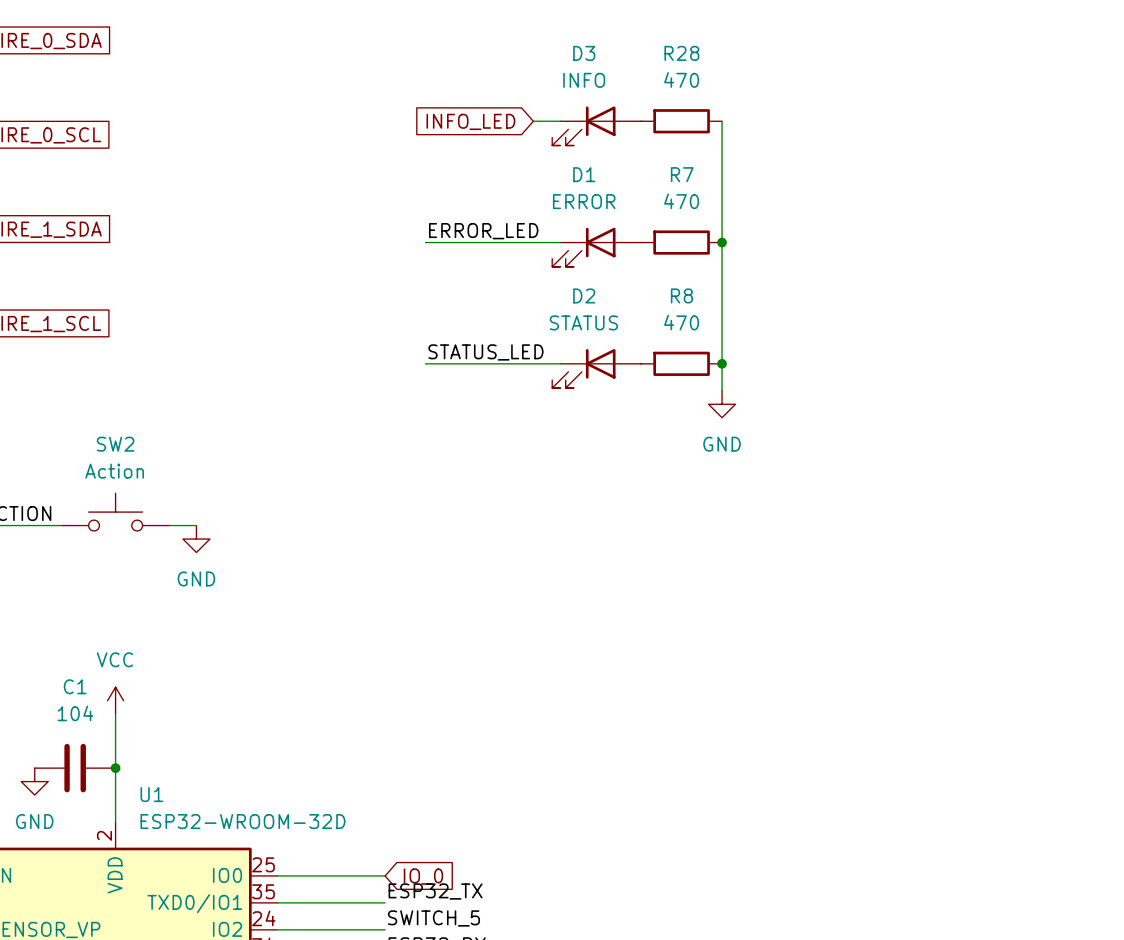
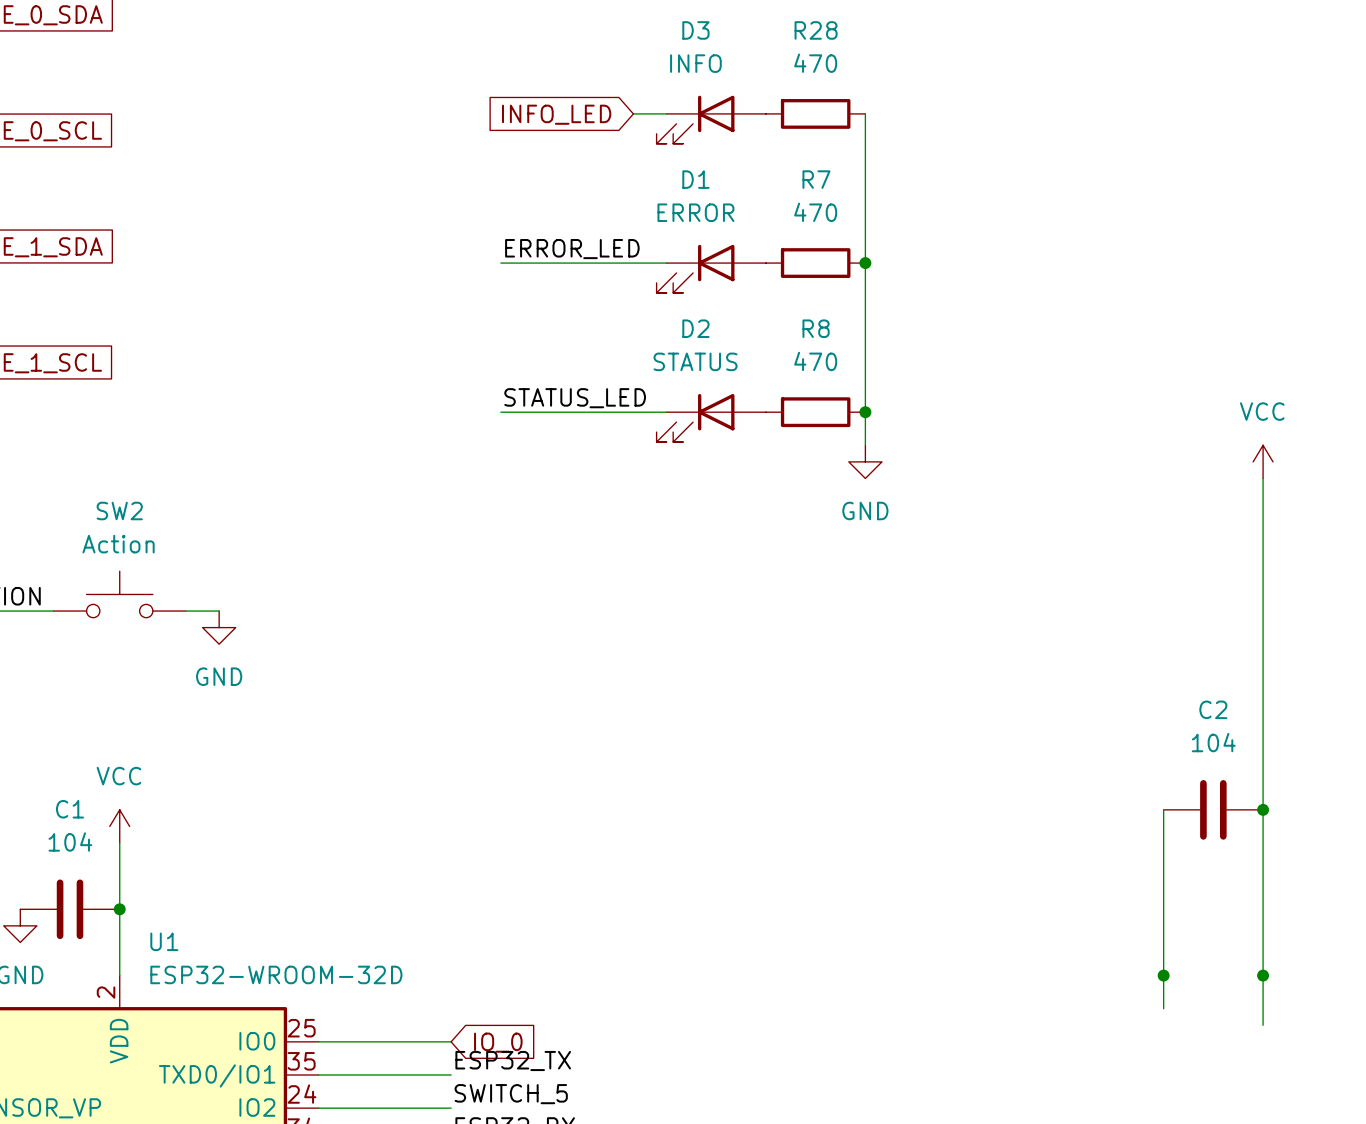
power symbol: none -> VCC (1263, 461)
wire: none -> (1263, 478) (1263, 1025)
wire: none -> (1163, 809) (1163, 1008)
C2: none -> 104 (1213, 809)
junction: none -> (1263, 809)
junction: none -> (1163, 975)
junction: none -> (1263, 975)

